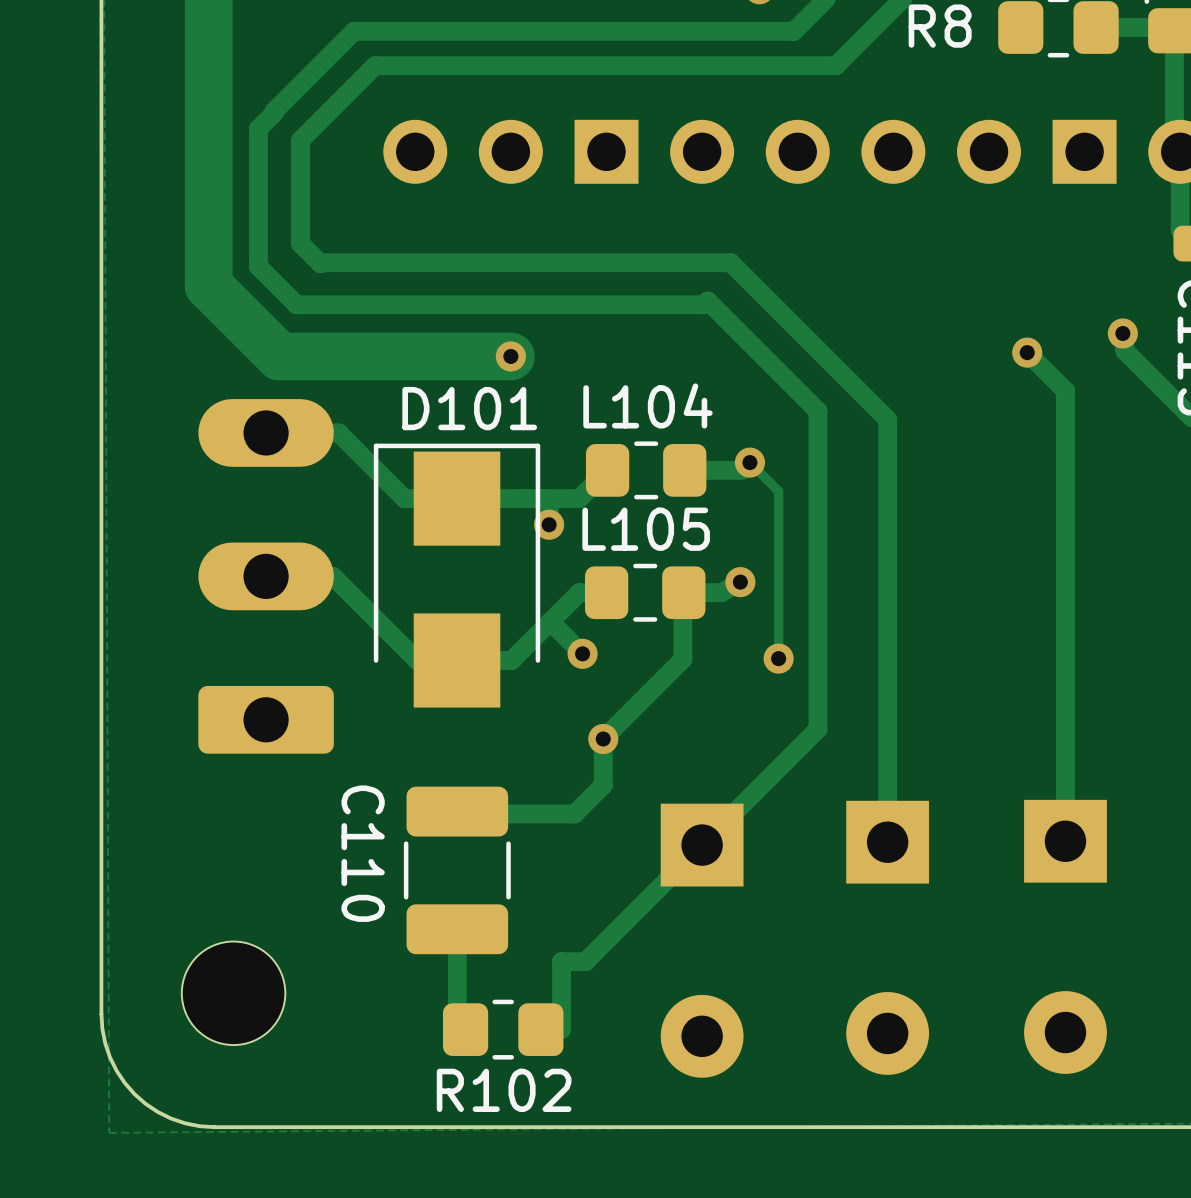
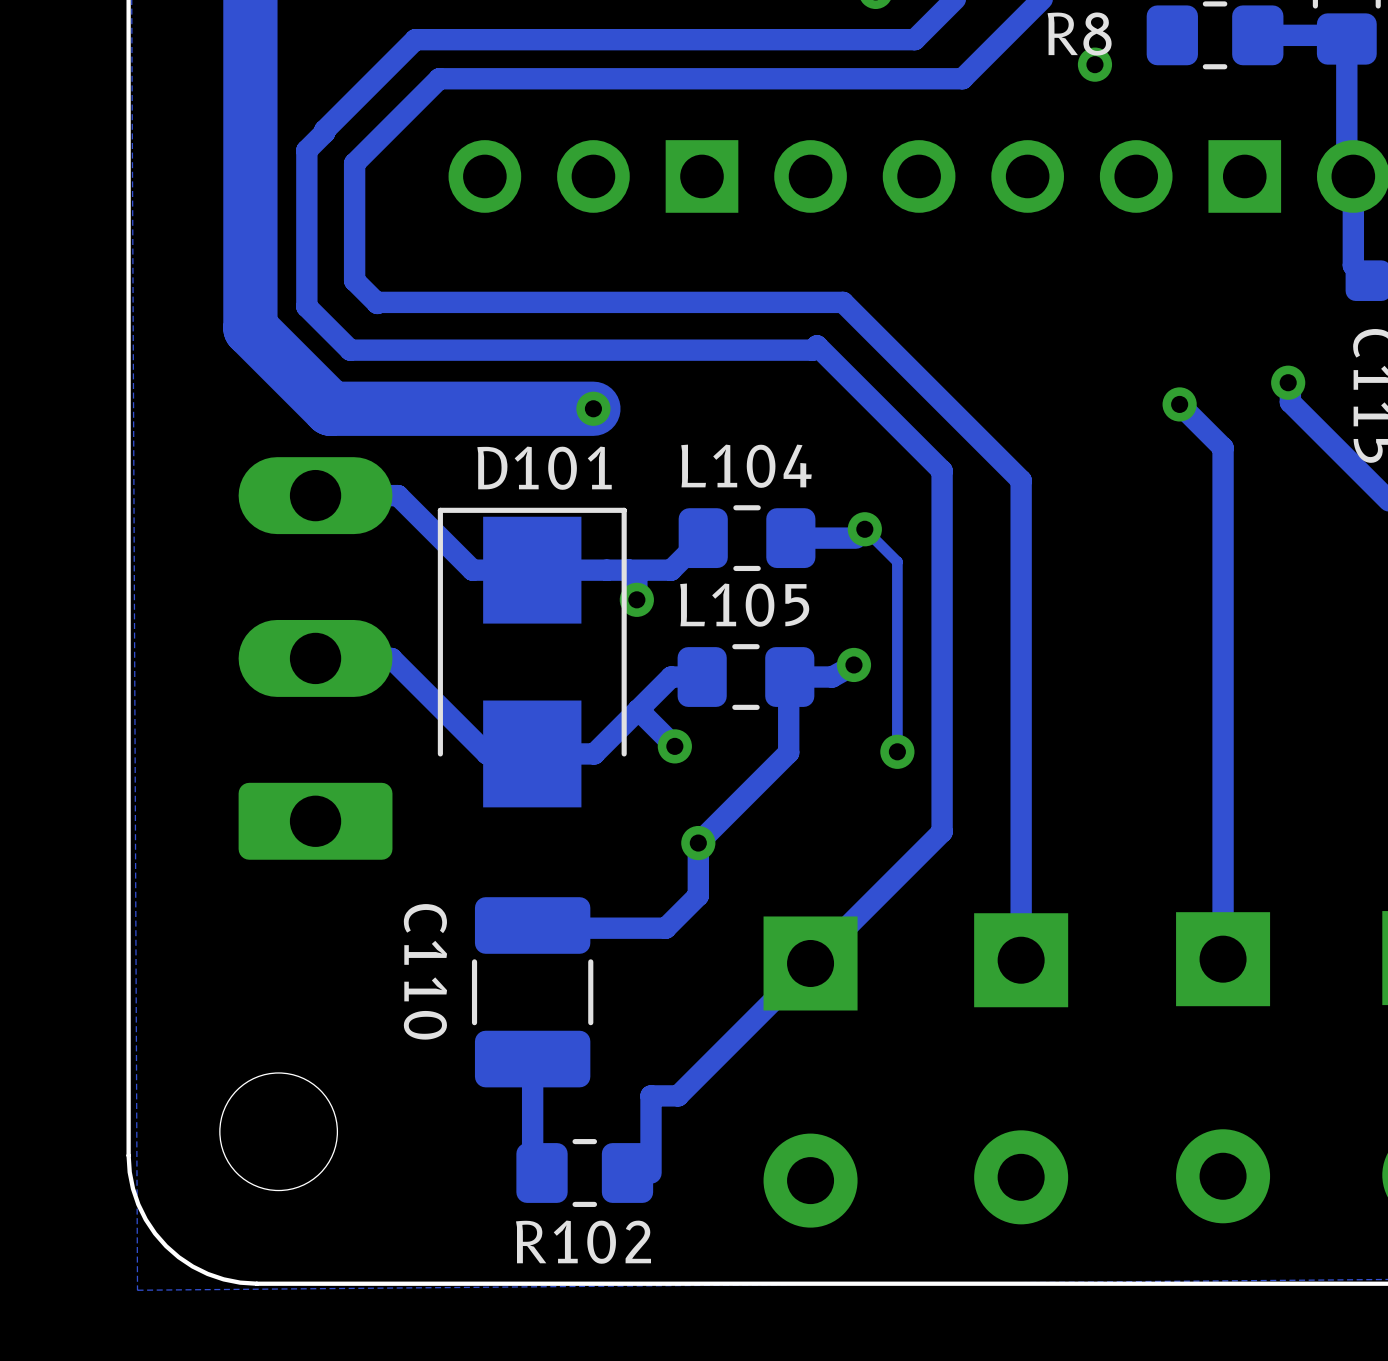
via: none -> (1094, 64)

